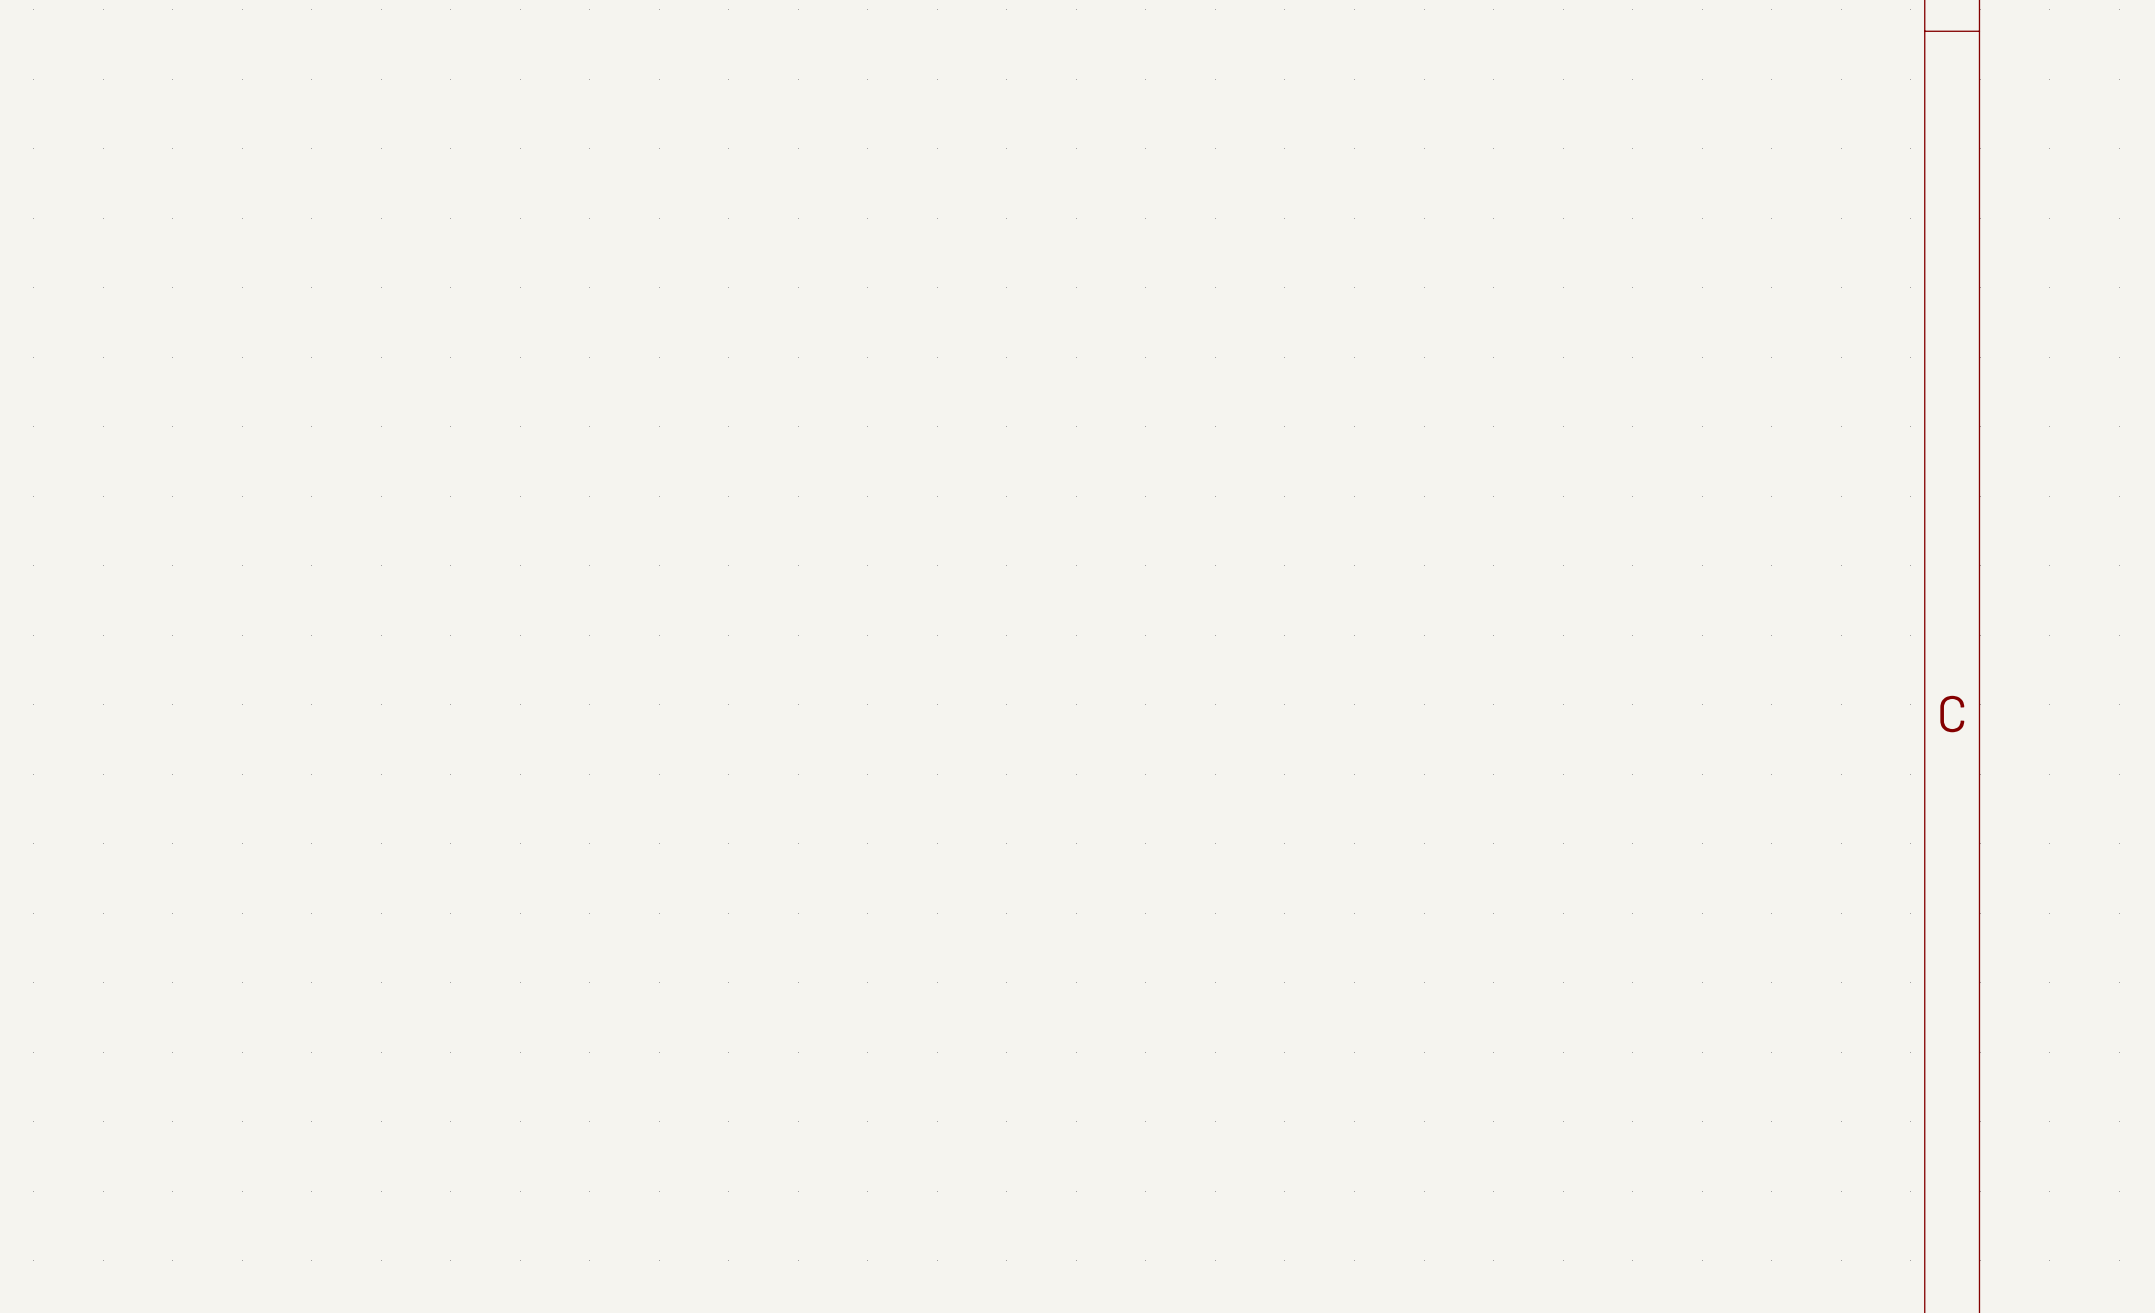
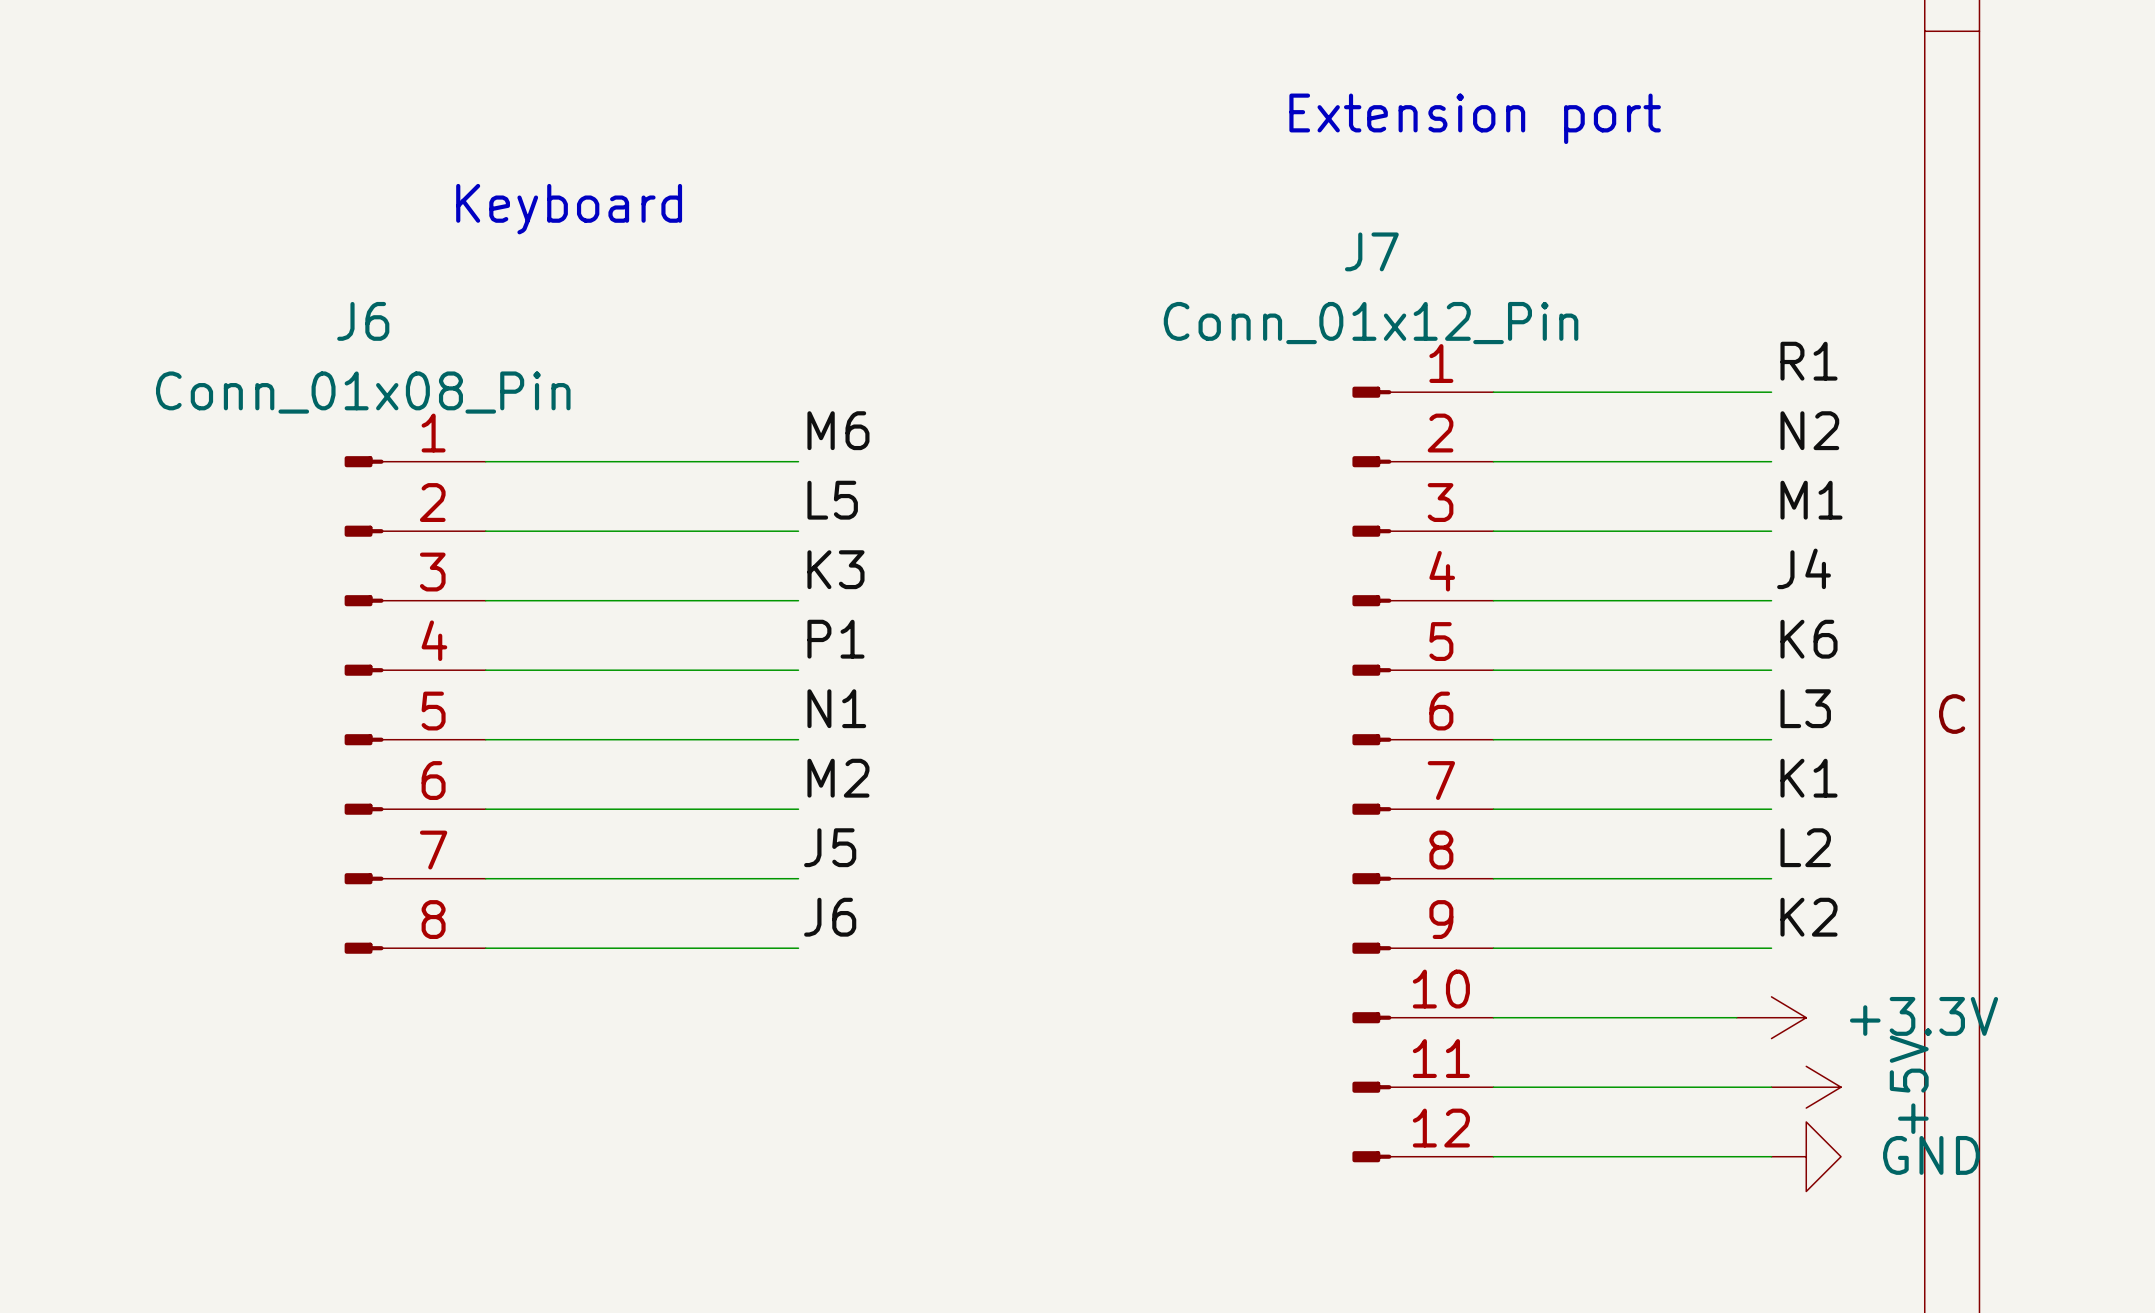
text: none -> Extension port (1475, 118)
text: none -> Keyboard (569, 209)
label: none -> R1 (1809, 361)
wire: none -> (1493, 392) (1771, 392)
label: none -> M6 (838, 430)
label: none -> N2 (1809, 430)
wire: none -> (485, 461) (798, 461)
wire: none -> (1493, 461) (1771, 461)
label: none -> L5 (832, 500)
label: none -> M1 (1811, 500)
wire: none -> (485, 531) (798, 531)
wire: none -> (1493, 531) (1771, 531)
label: none -> K3 (835, 569)
label: none -> J4 (1804, 568)
wire: none -> (485, 600) (798, 600)
wire: none -> (1493, 600) (1771, 600)
label: none -> P1 (835, 639)
label: none -> K6 (1809, 639)
wire: none -> (485, 670) (798, 670)
wire: none -> (1493, 670) (1771, 670)
J6: none -> Conn_01x08_Pin (415, 704)
label: none -> N1 (836, 708)
label: none -> L3 (1805, 708)
wire: none -> (485, 739) (798, 739)
wire: none -> (1493, 739) (1771, 739)
J7: none -> Conn_01x12_Pin (1422, 774)
label: none -> M2 (838, 778)
label: none -> K1 (1809, 778)
wire: none -> (485, 809) (798, 809)
wire: none -> (1493, 809) (1771, 809)
label: none -> J5 (830, 847)
label: none -> L2 (1805, 847)
wire: none -> (485, 878) (798, 878)
wire: none -> (1493, 878) (1771, 878)
label: none -> J6 (830, 917)
label: none -> K2 (1809, 917)
wire: none -> (485, 948) (798, 948)
wire: none -> (1493, 948) (1771, 948)
wire: none -> (1493, 1017) (1736, 1017)
power symbol: none -> +3.3V (1771, 1017)
wire: none -> (1493, 1087) (1771, 1087)
power symbol: none -> +5V (1806, 1087)
wire: none -> (1493, 1156) (1771, 1156)
power symbol: none -> GND (1806, 1156)

